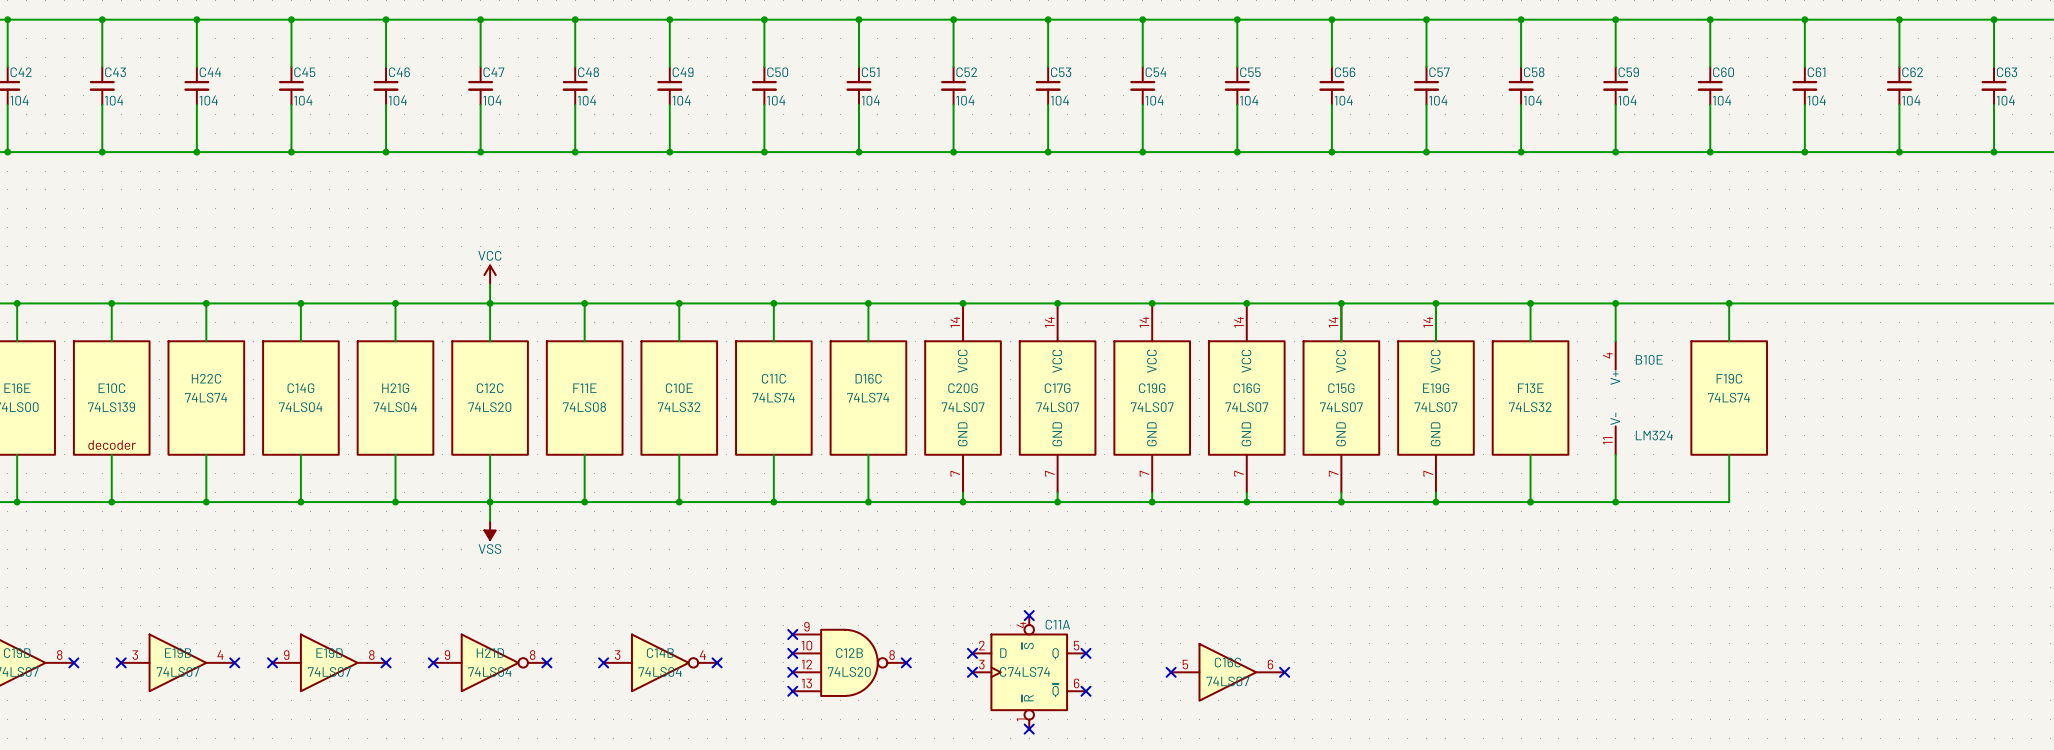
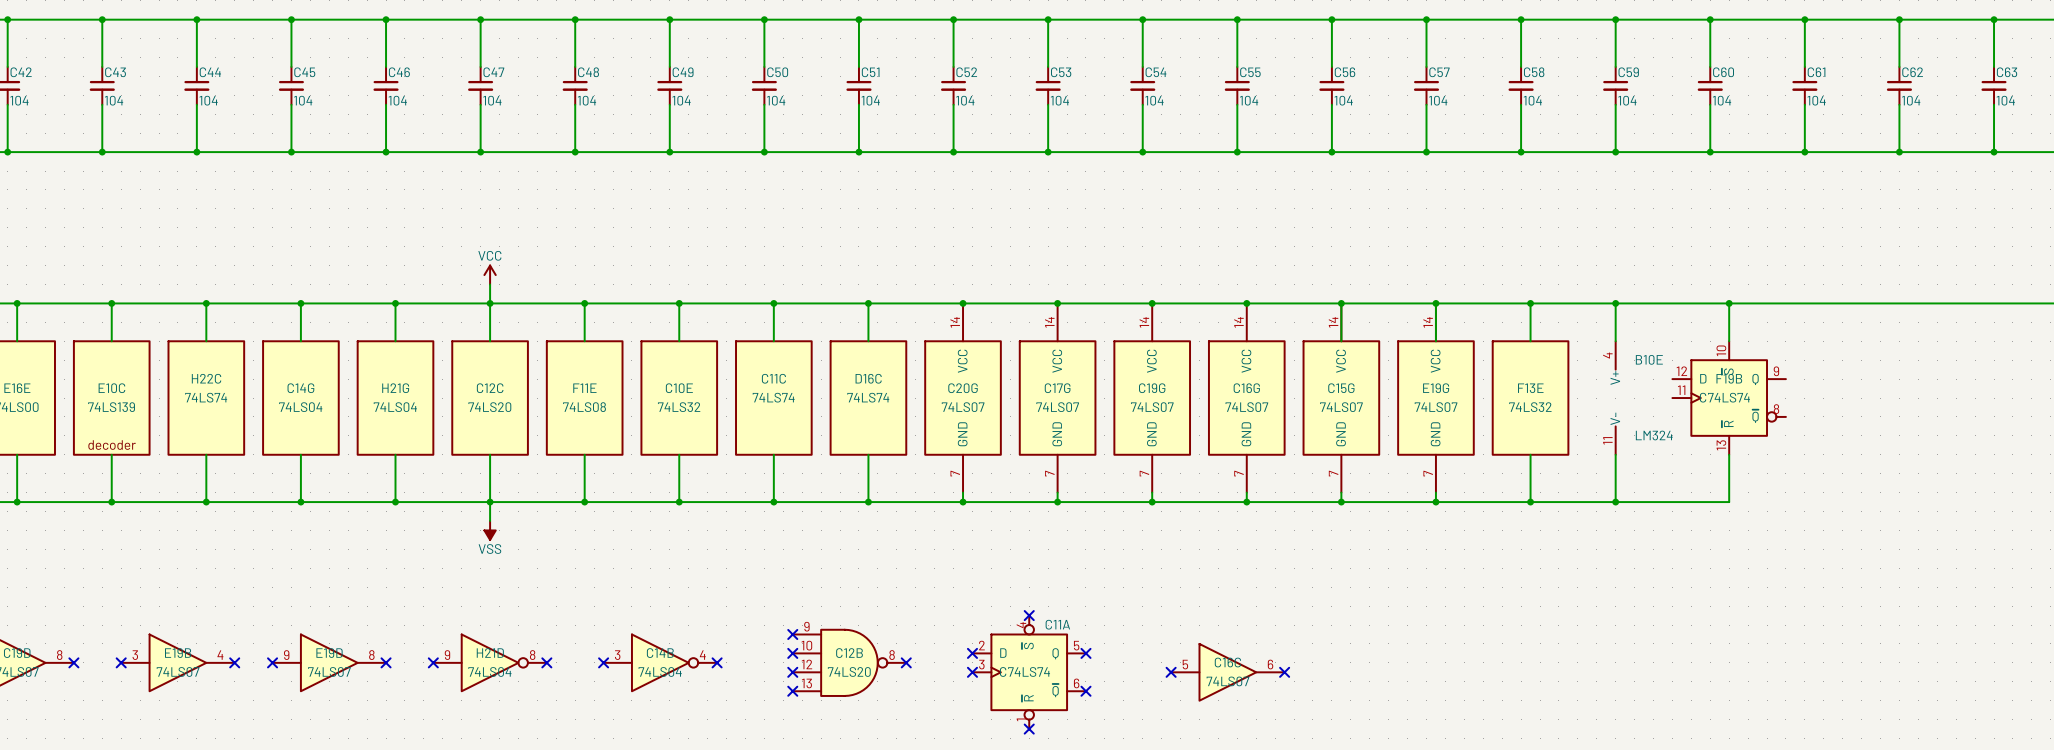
F19C: 74LS74 (1729, 398) -> none
F19B: none -> 74LS74 (1729, 398)

